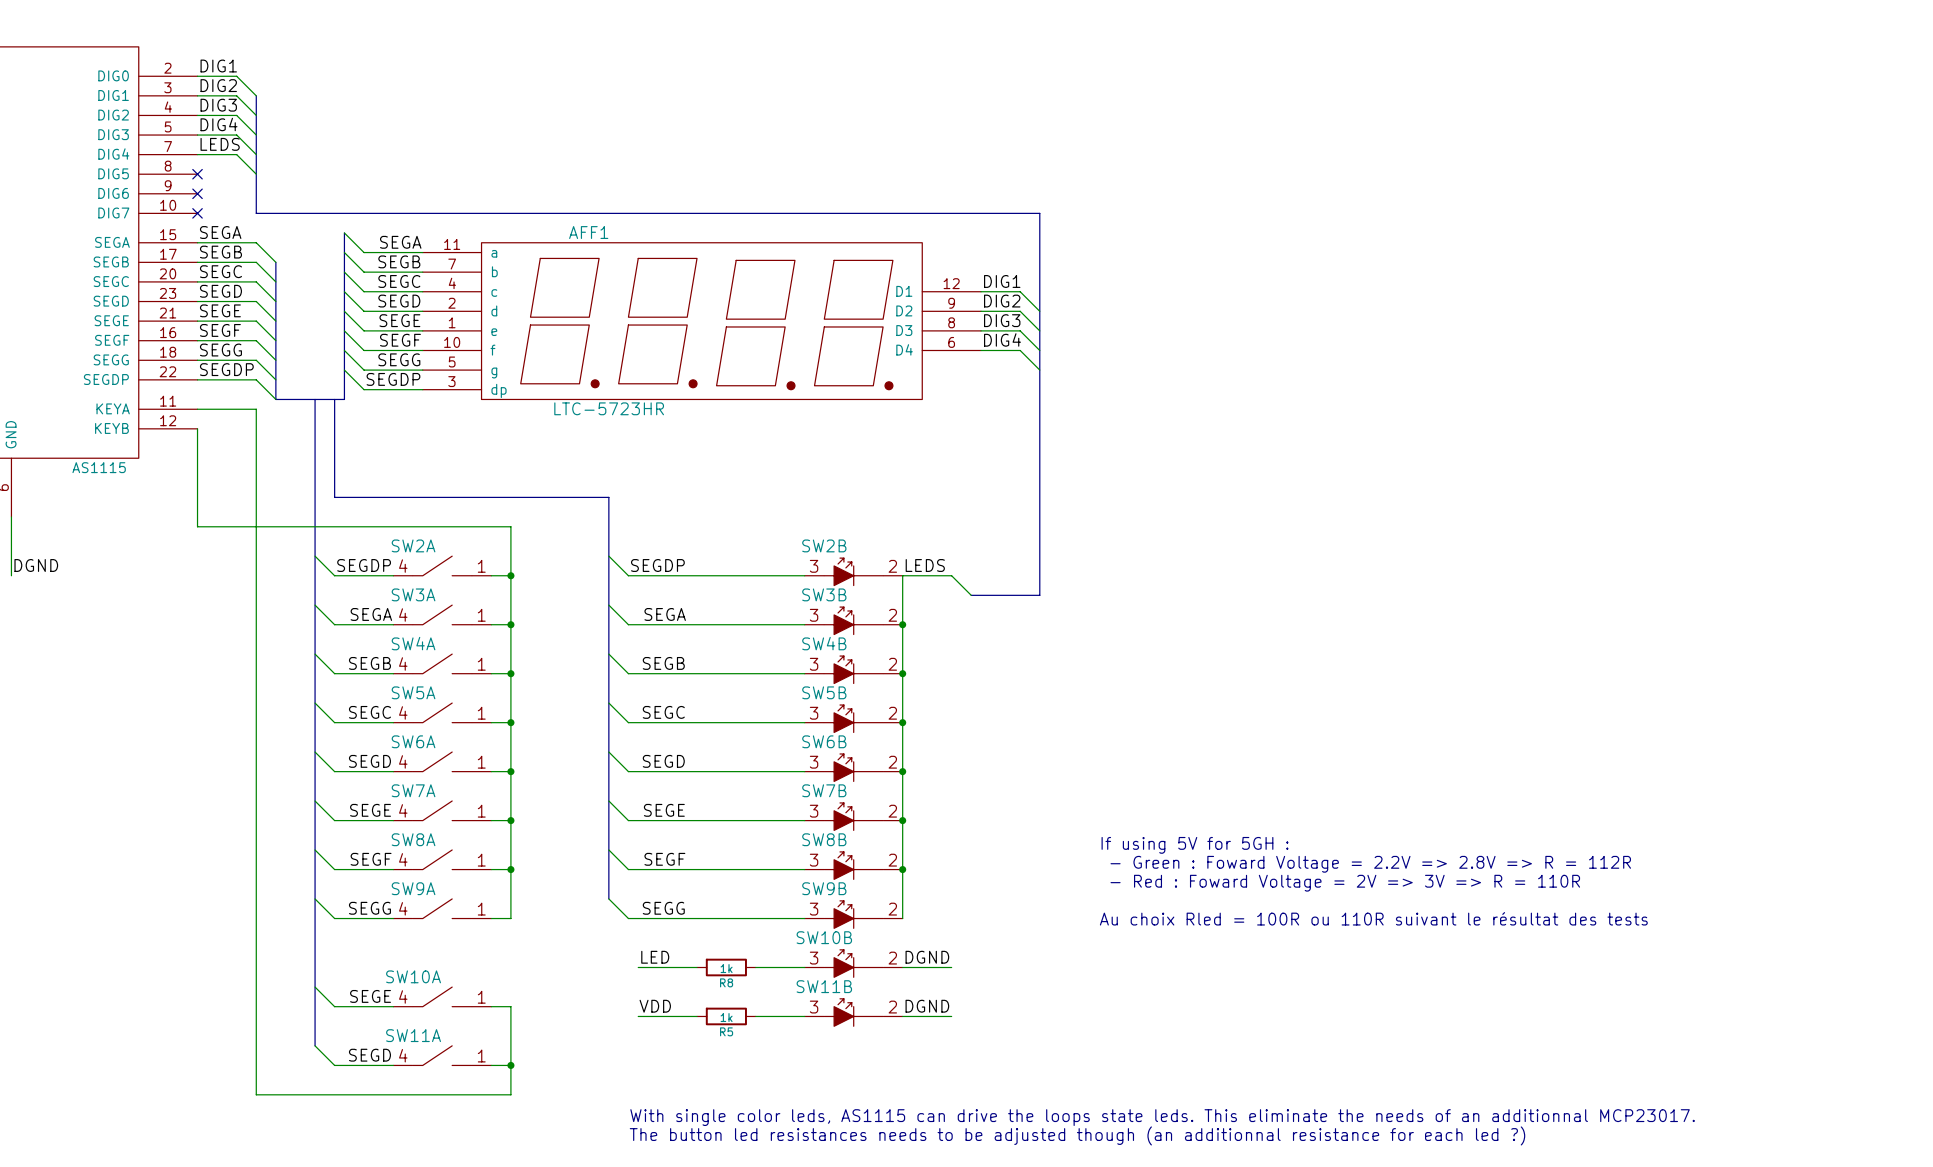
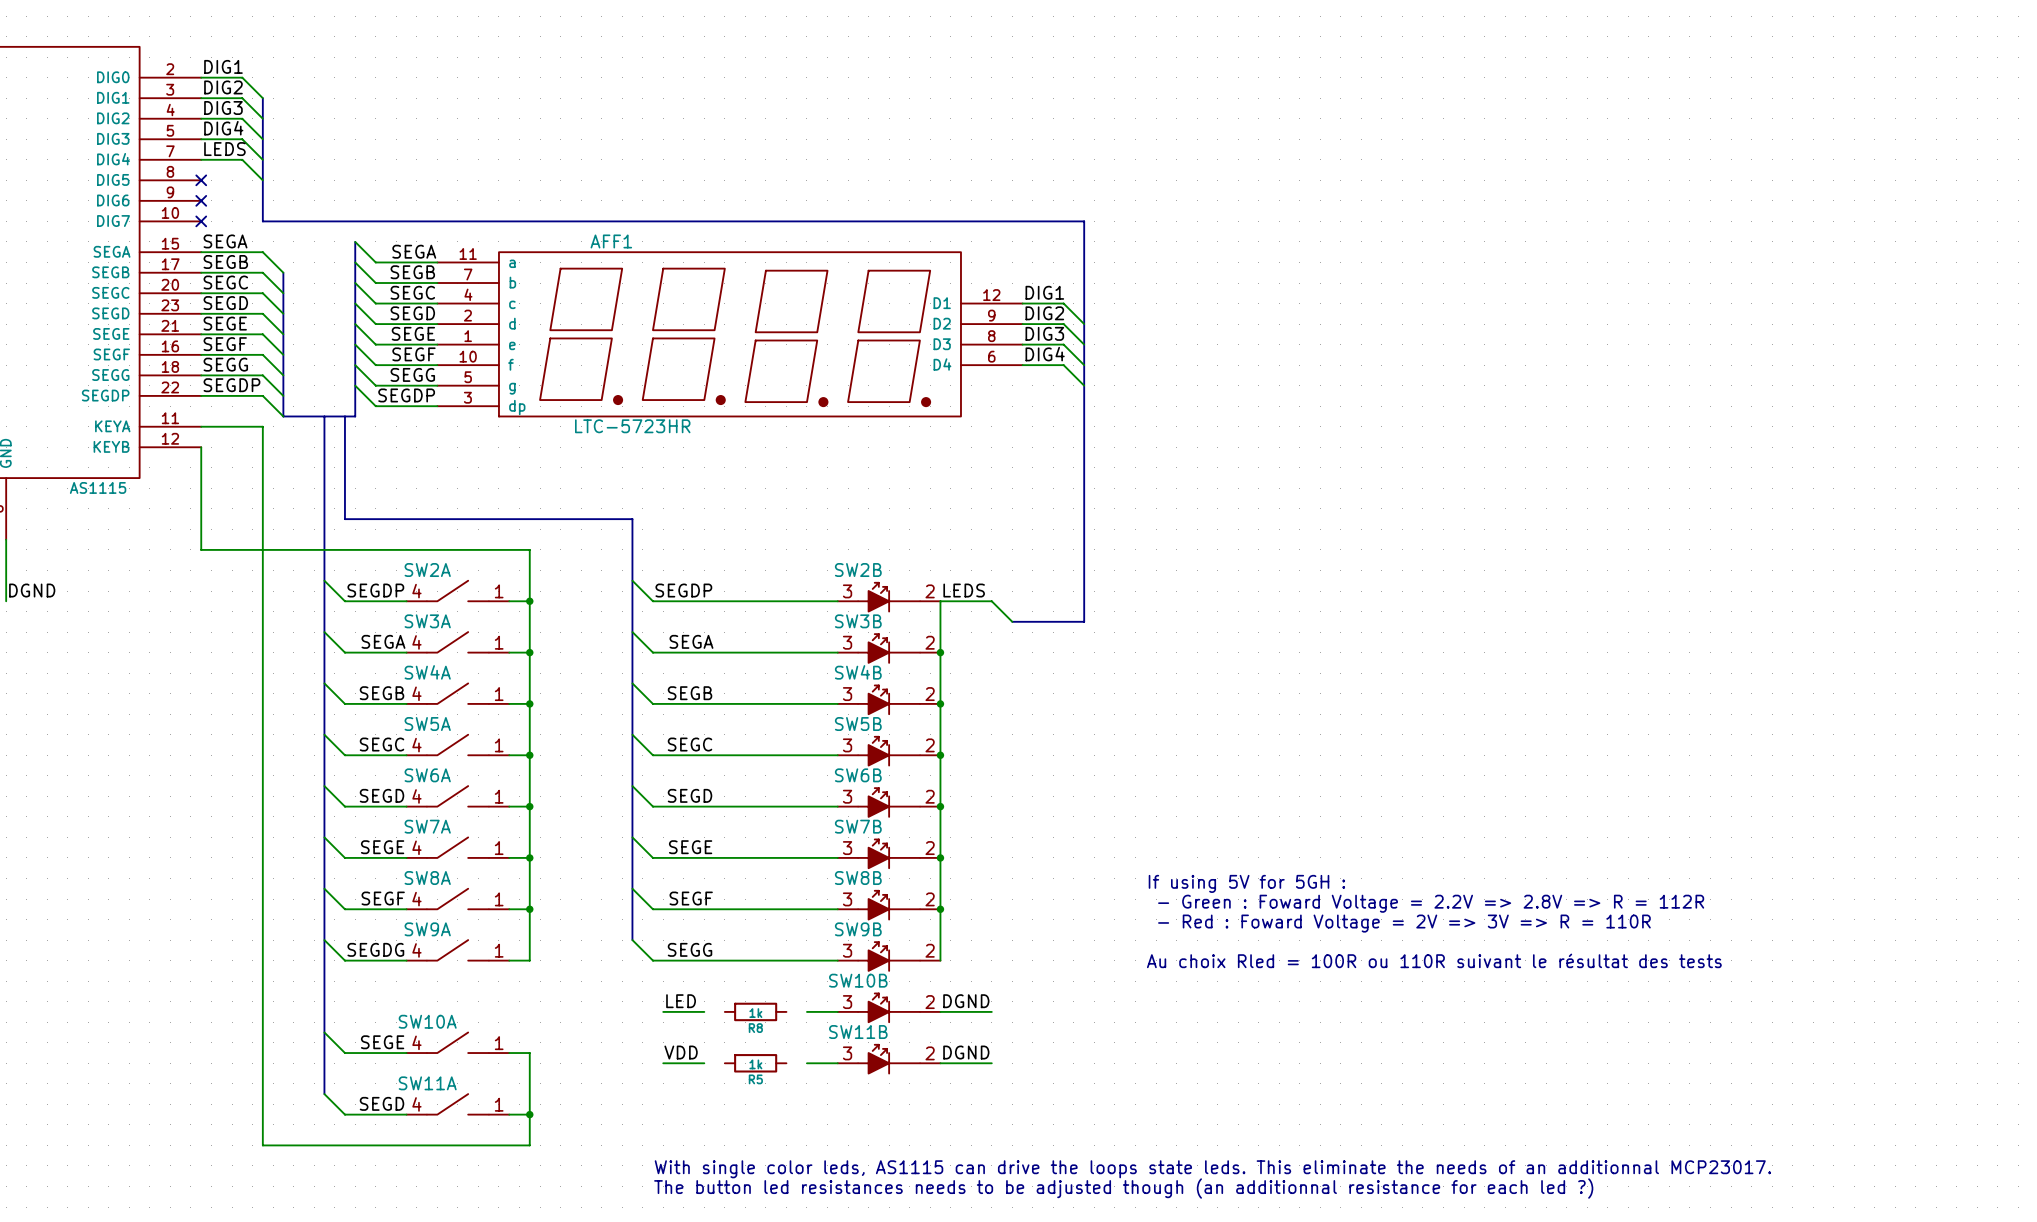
label: SEGG (369, 908) -> SEGDG (375, 949)
wire: (677, 967) (697, 967) -> none
wire: (755, 967) (775, 967) -> none
wire: (677, 1016) (697, 1016) -> none
wire: (755, 1016) (775, 1016) -> none

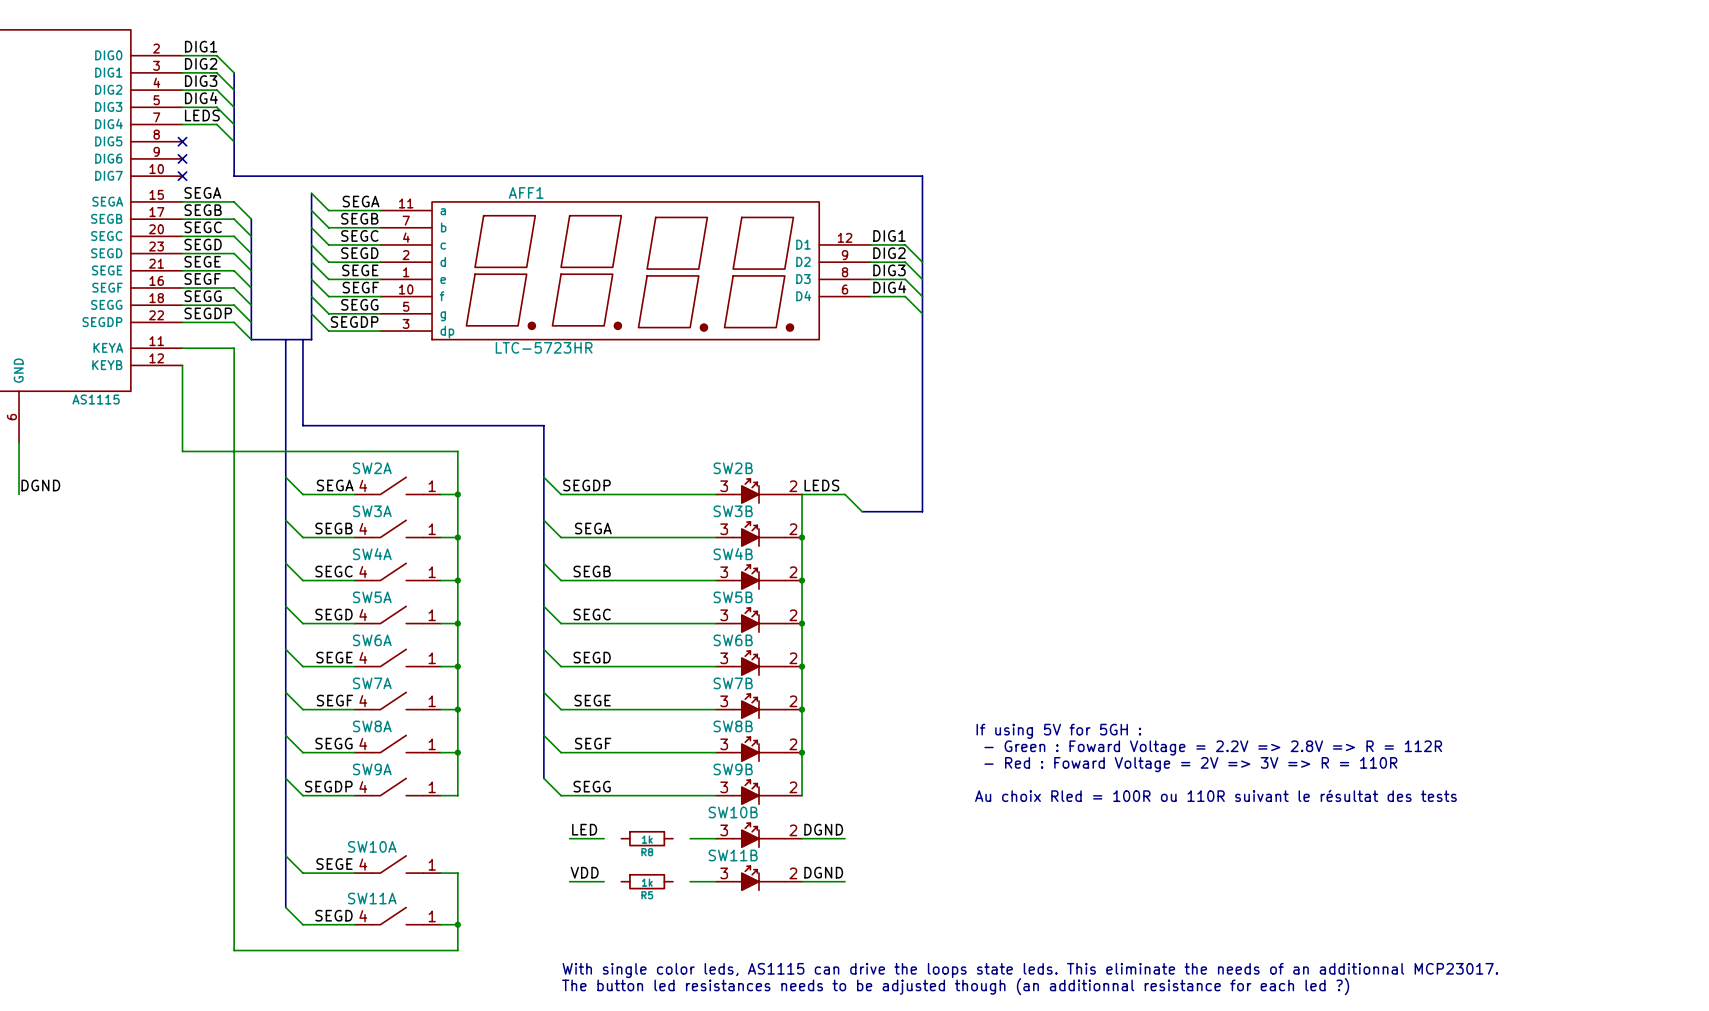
label: SEGDP (375, 590) -> SEGA (335, 485)
label: SEGA (383, 641) -> SEGB (334, 528)
label: SEGB (382, 693) -> SEGC (334, 571)
label: SEGC (382, 744) -> SEGD (334, 614)
label: SEGD (382, 795) -> SEGE (334, 657)
label: SEGE (382, 847) -> SEGF (334, 700)
label: SEGF (383, 898) -> SEGG (334, 743)
label: SEGDG (375, 949) -> SEGDP (328, 786)

